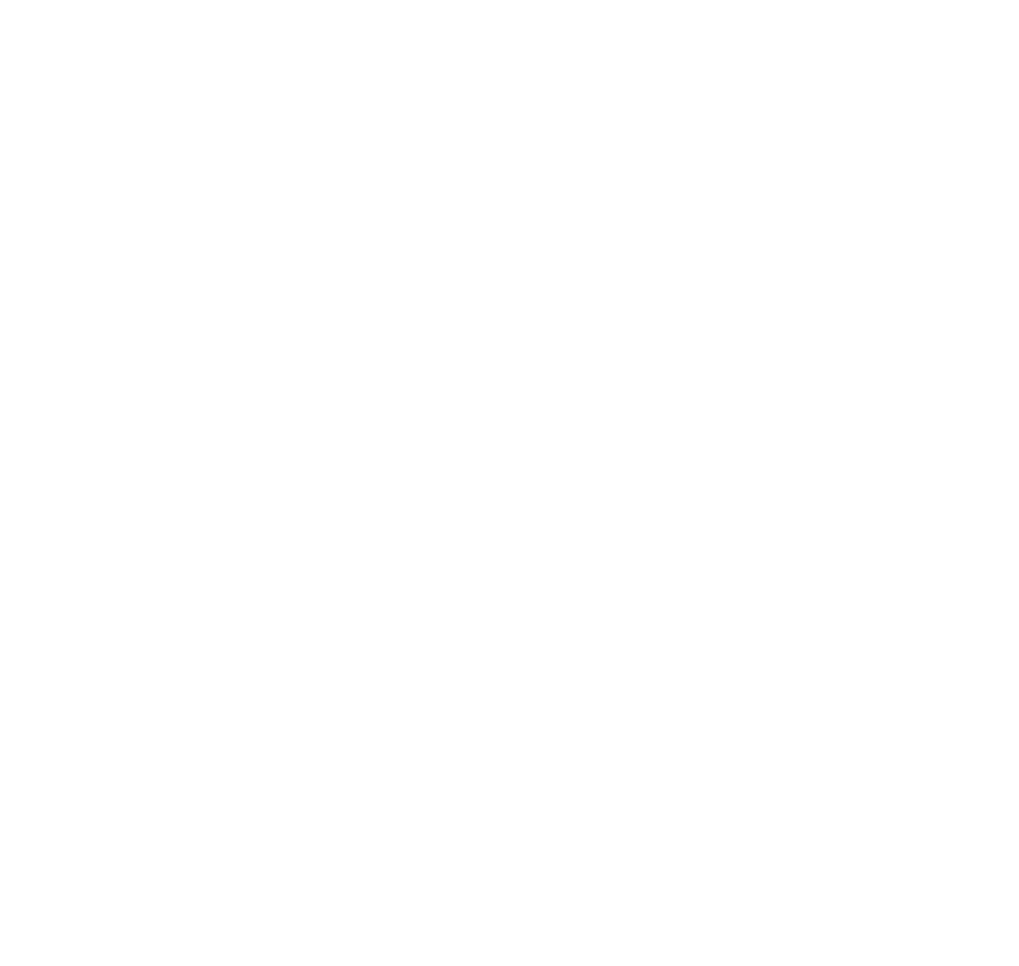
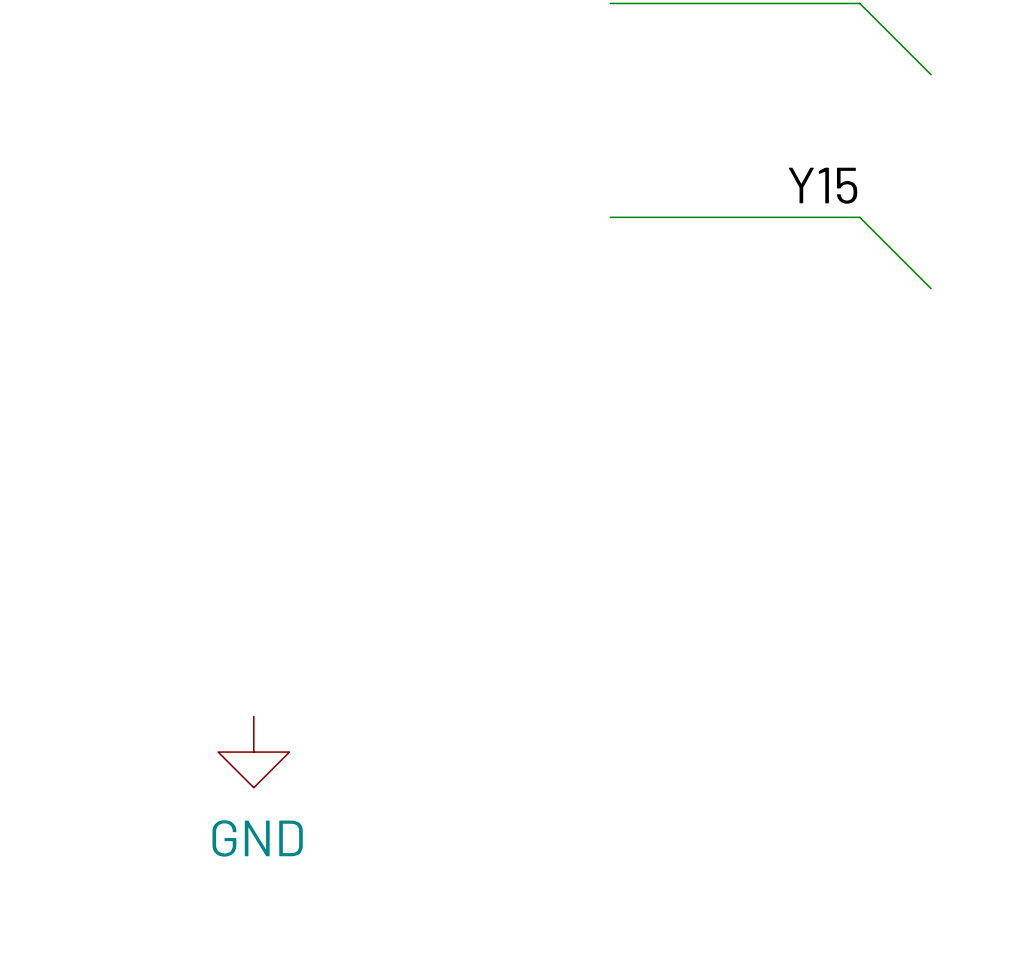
wire: none -> (610, 3) (859, 3) (931, 74)
label: none -> Y15 (823, 185)
wire: none -> (610, 217) (859, 217) (931, 288)
power symbol: none -> GND (253, 752)

